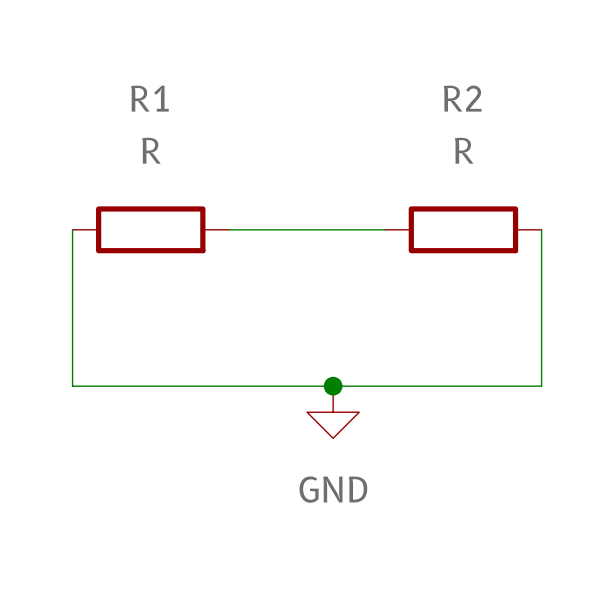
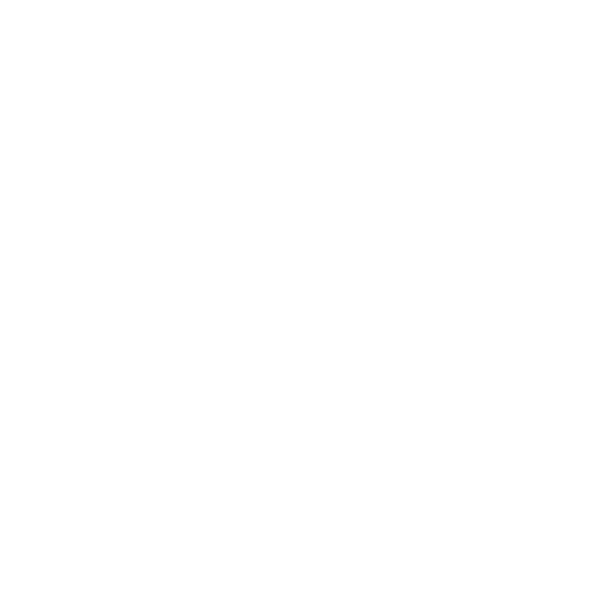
wire: (72, 229) (72, 386) (541, 386) (541, 229) -> none
R1: R (150, 229) -> none
wire: (228, 229) (385, 229) -> none
R2: R (463, 229) -> none
junction: (333, 386) -> none
power symbol: GND (333, 412) -> none

